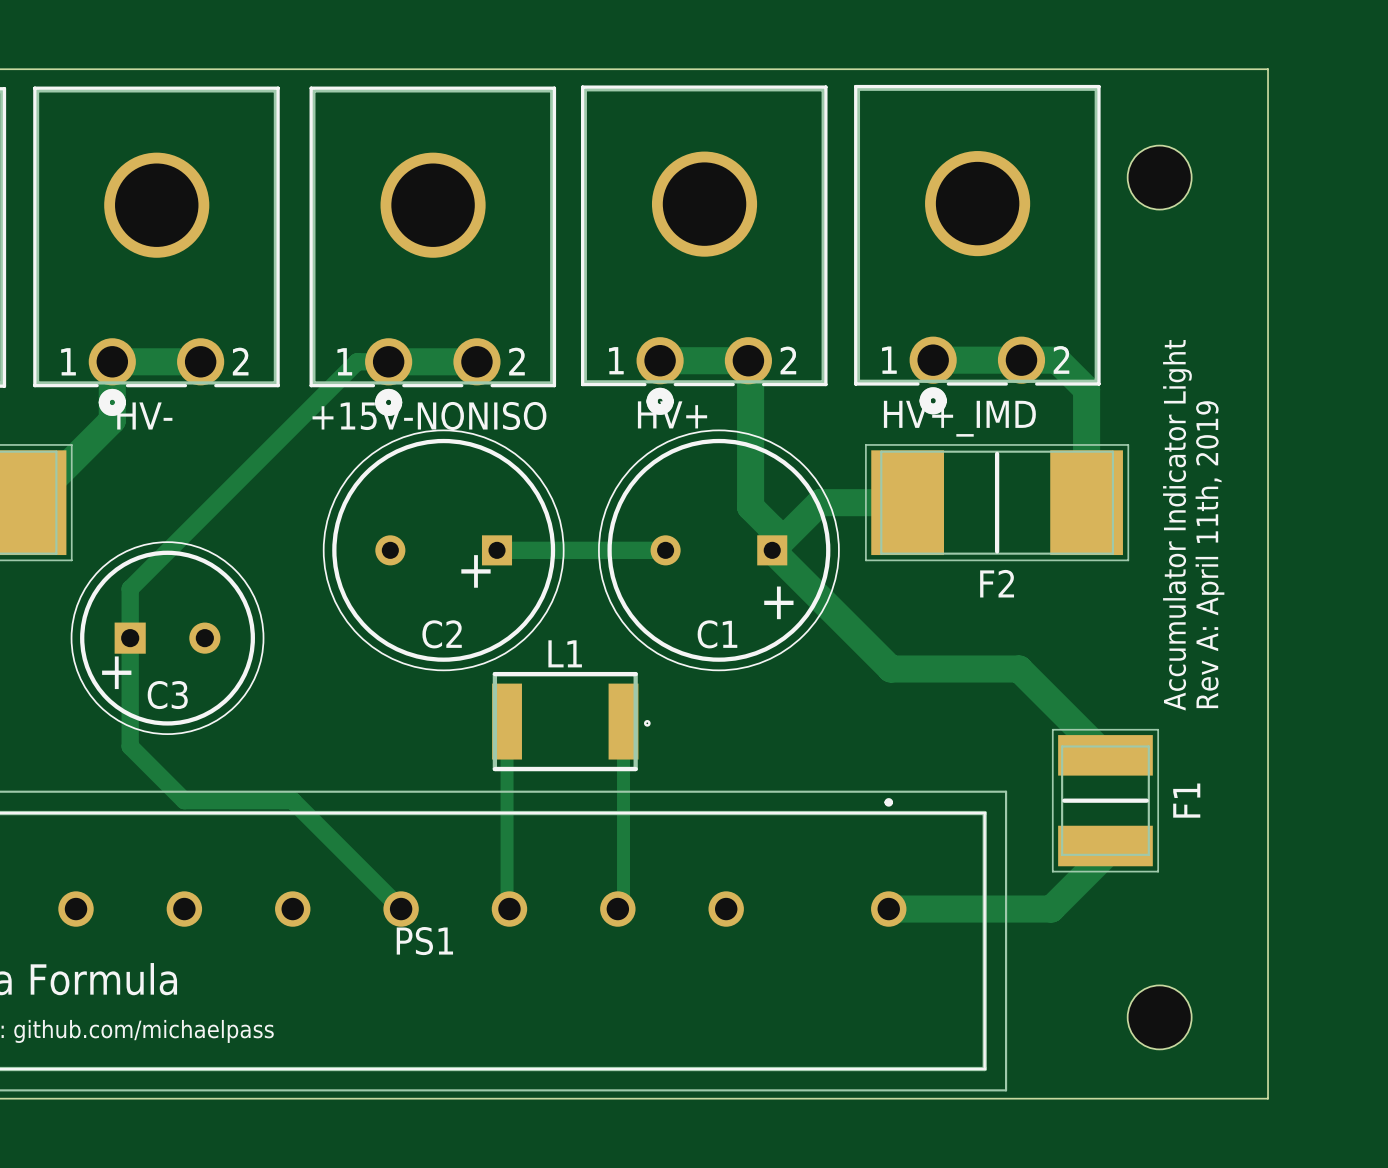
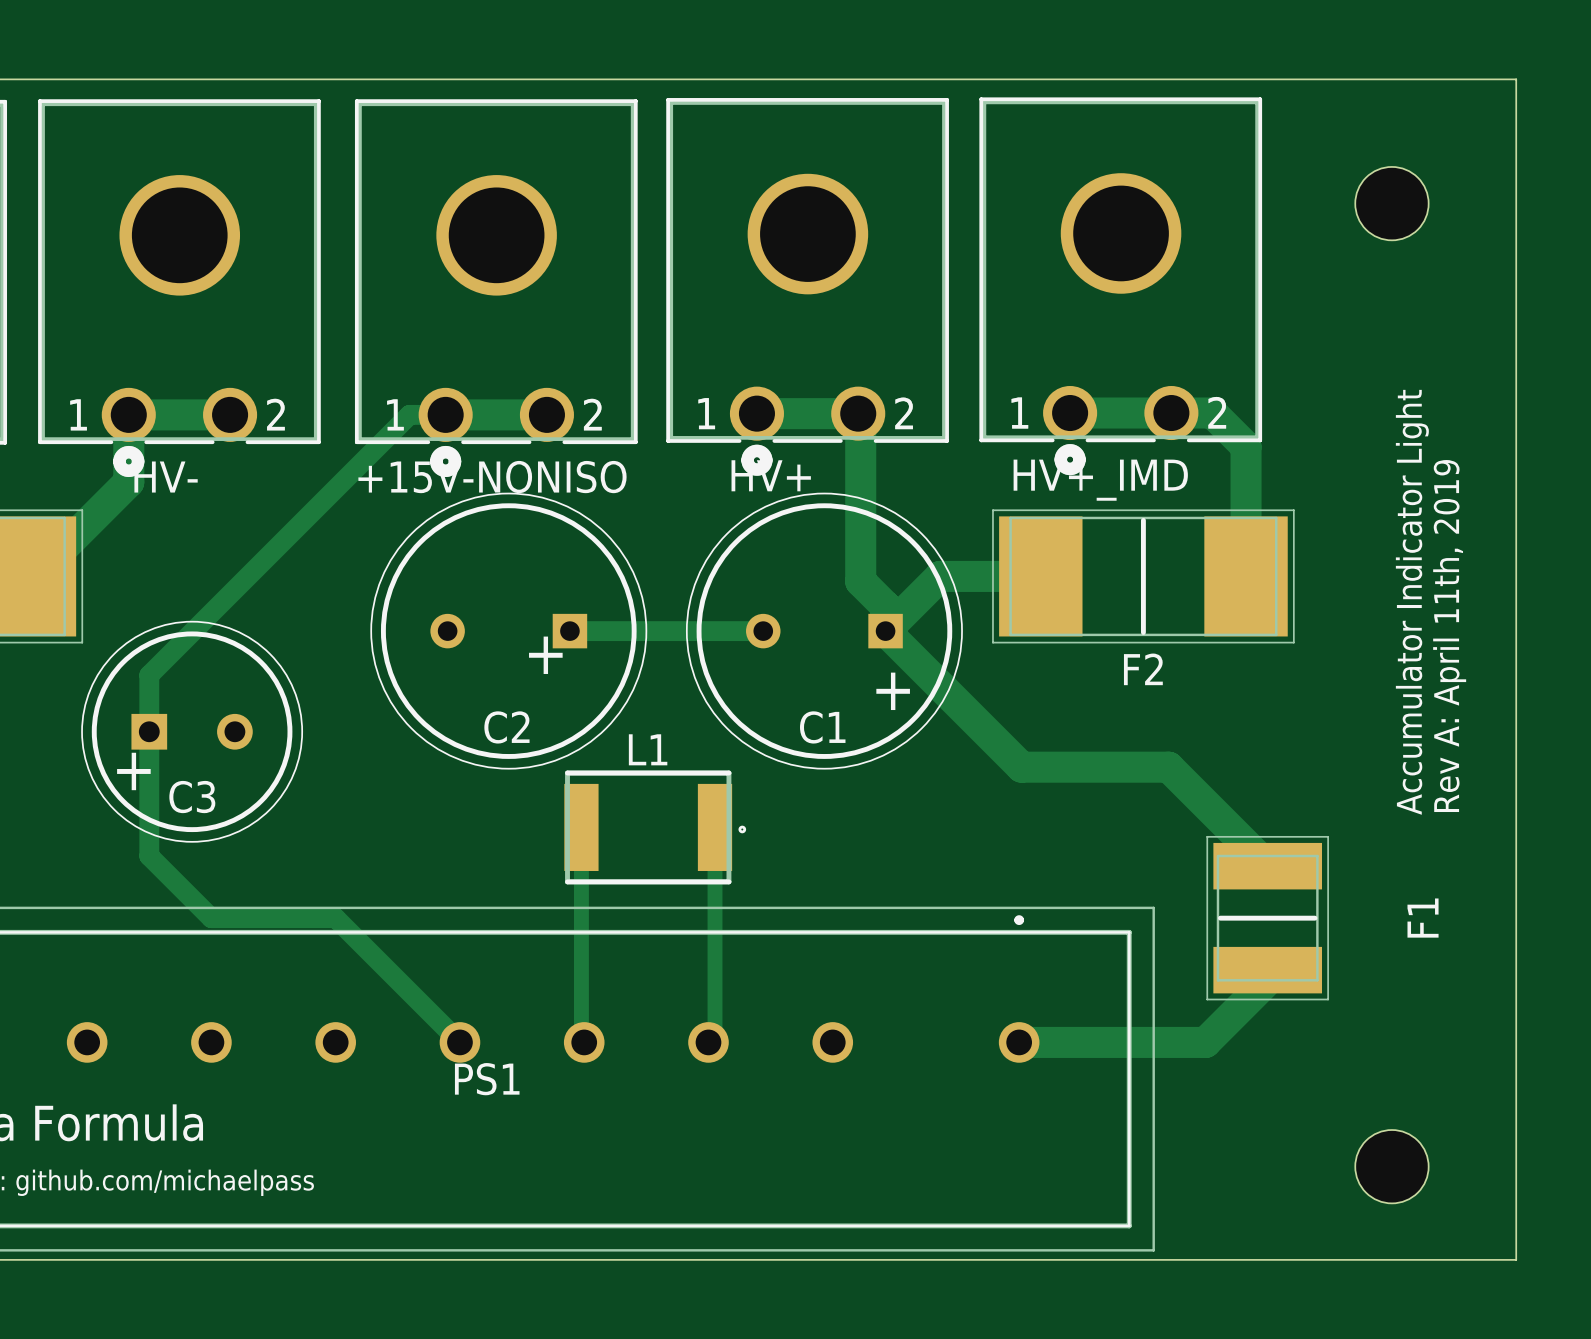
board edge: (1268, 69) (1268, 1098) -> (1454, 79) (1516, 79) (1516, 1259) (1454, 1259)
hole position: (1159, 177) -> (1391, 203)
text position: Accumulator Indicator Light (1177, 525) -> Accumulator Indicator Light (1412, 602)
text position: Rev A: April 11th, 2019 (1209, 554) -> Rev A: April 11th, 2019 (1449, 636)
F1 name position: F1 (1186, 800) -> F1 (1423, 918)
hole position: (1159, 1017) -> (1391, 1166)

